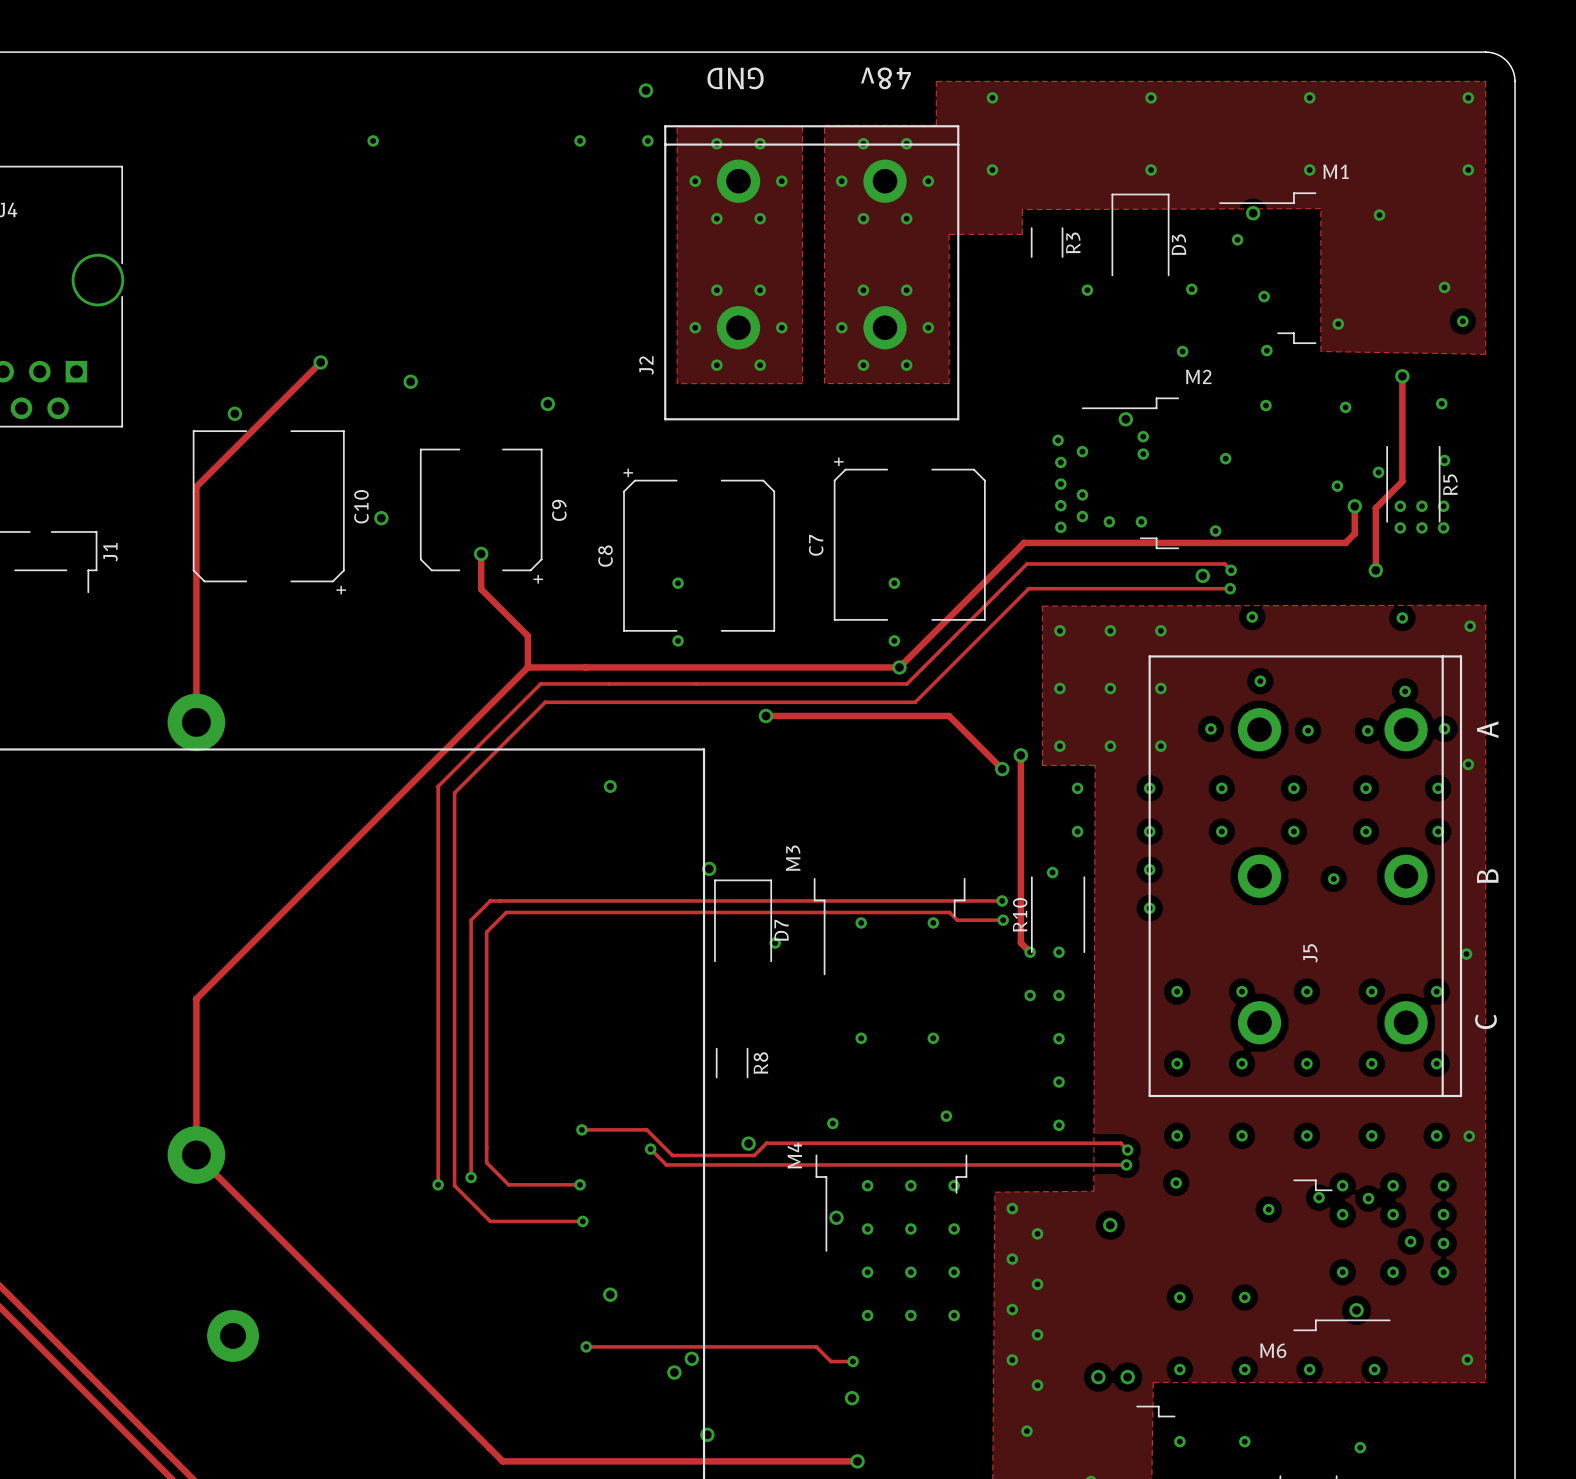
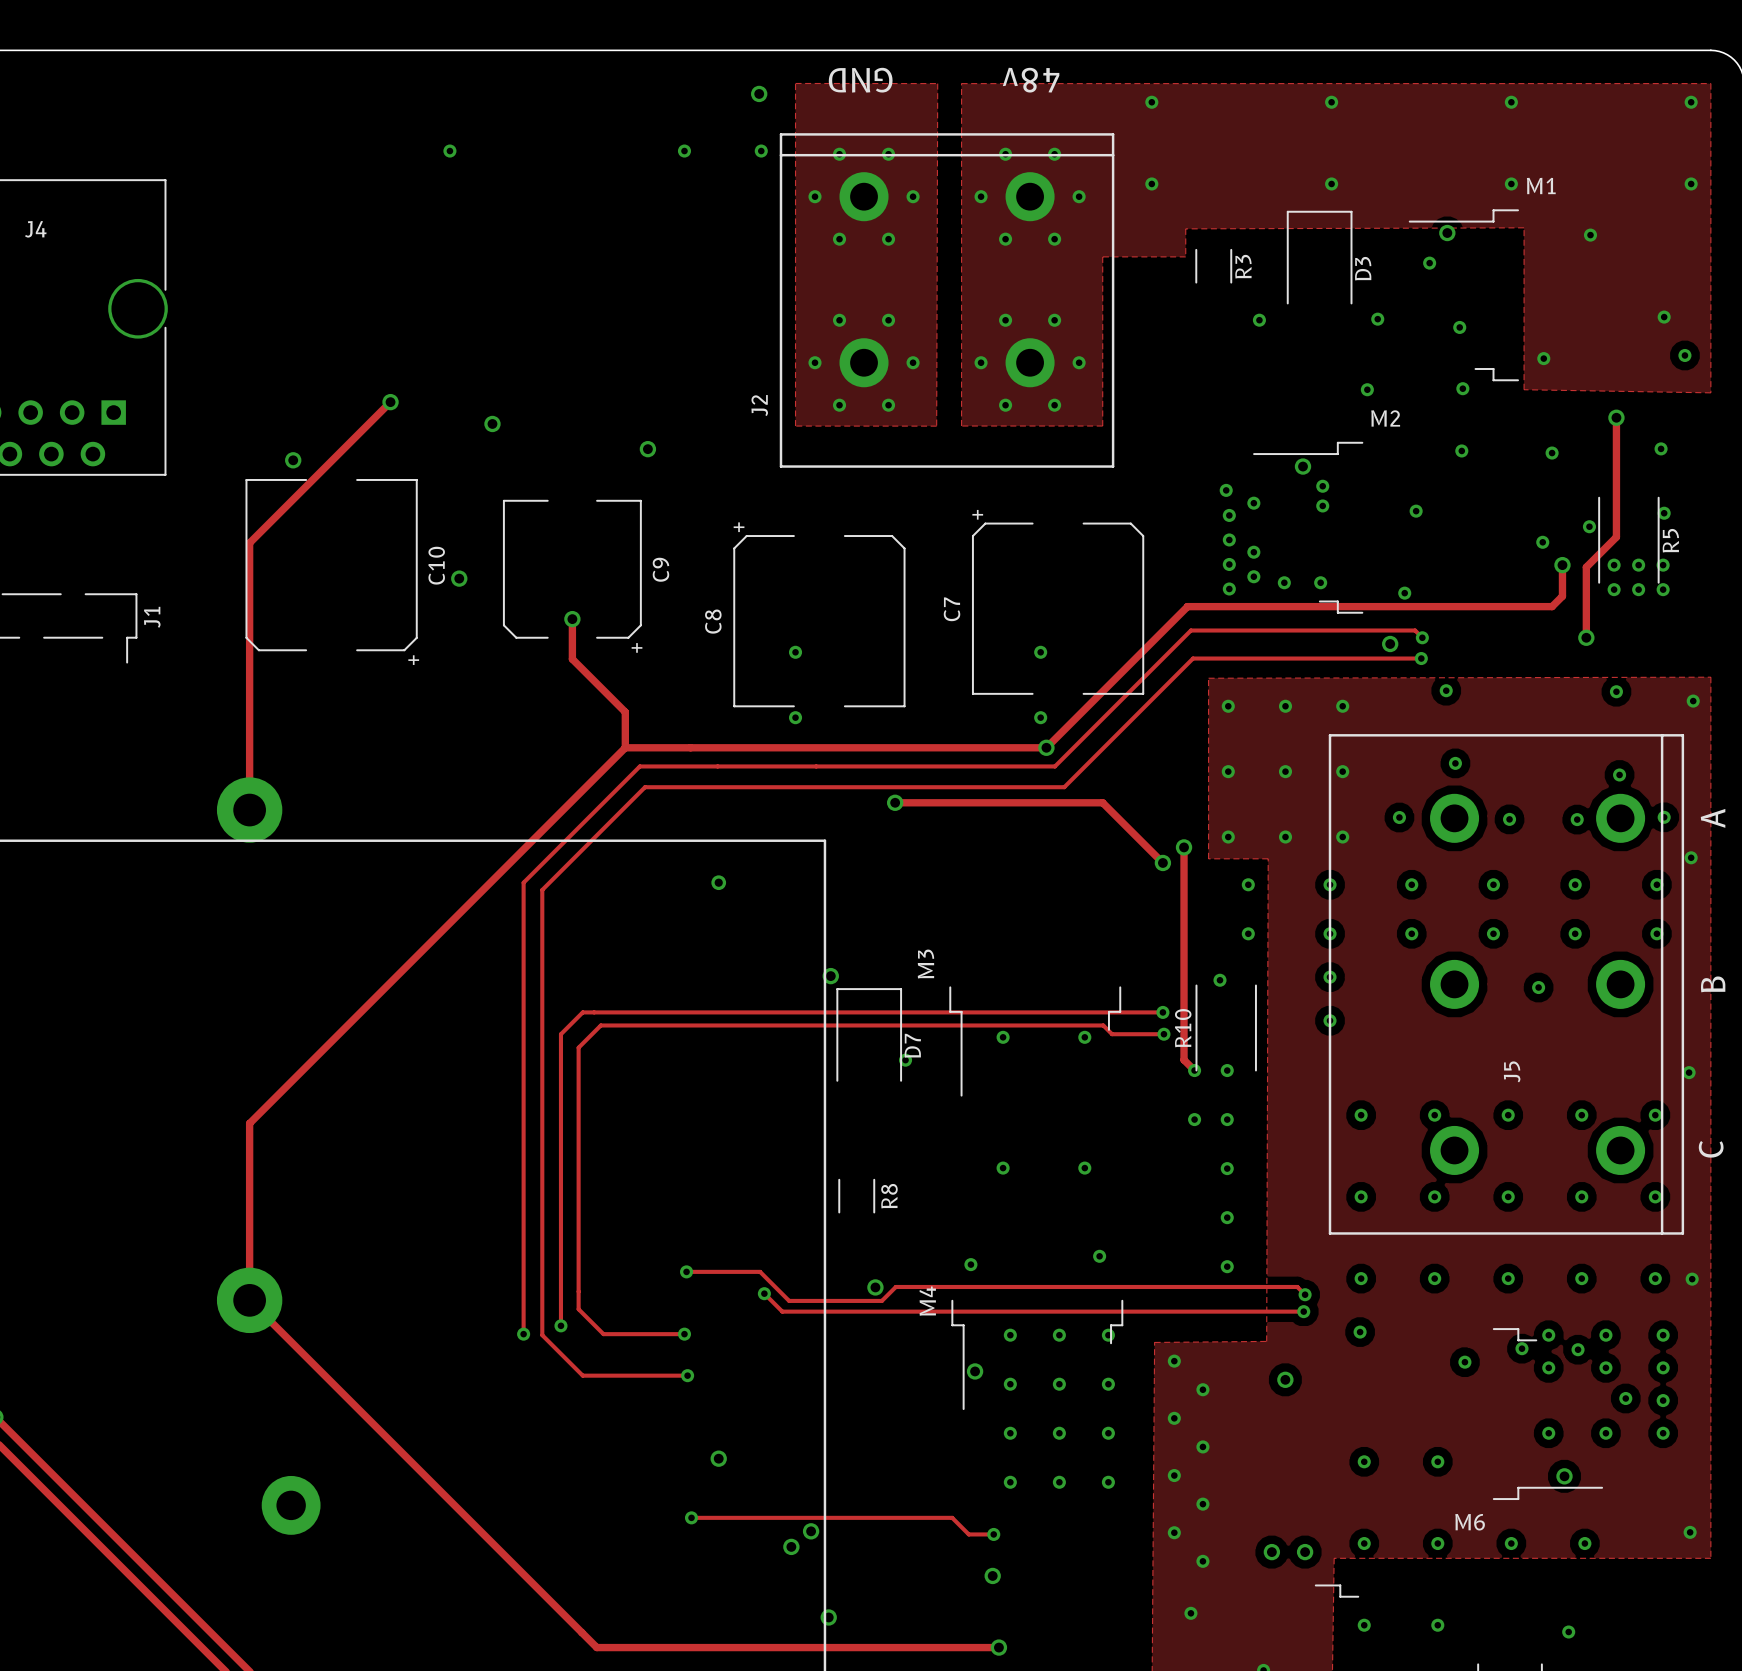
zone outline: (1485, 81) (936, 81) (936, 125) (824, 125) -> (1710, 83) (961, 83) (961, 133)
zone outline: (677, 126) (802, 126) (802, 383) (677, 383) (677, 126) -> (795, 83) (795, 426) (936, 426) (937, 83) (795, 83)

